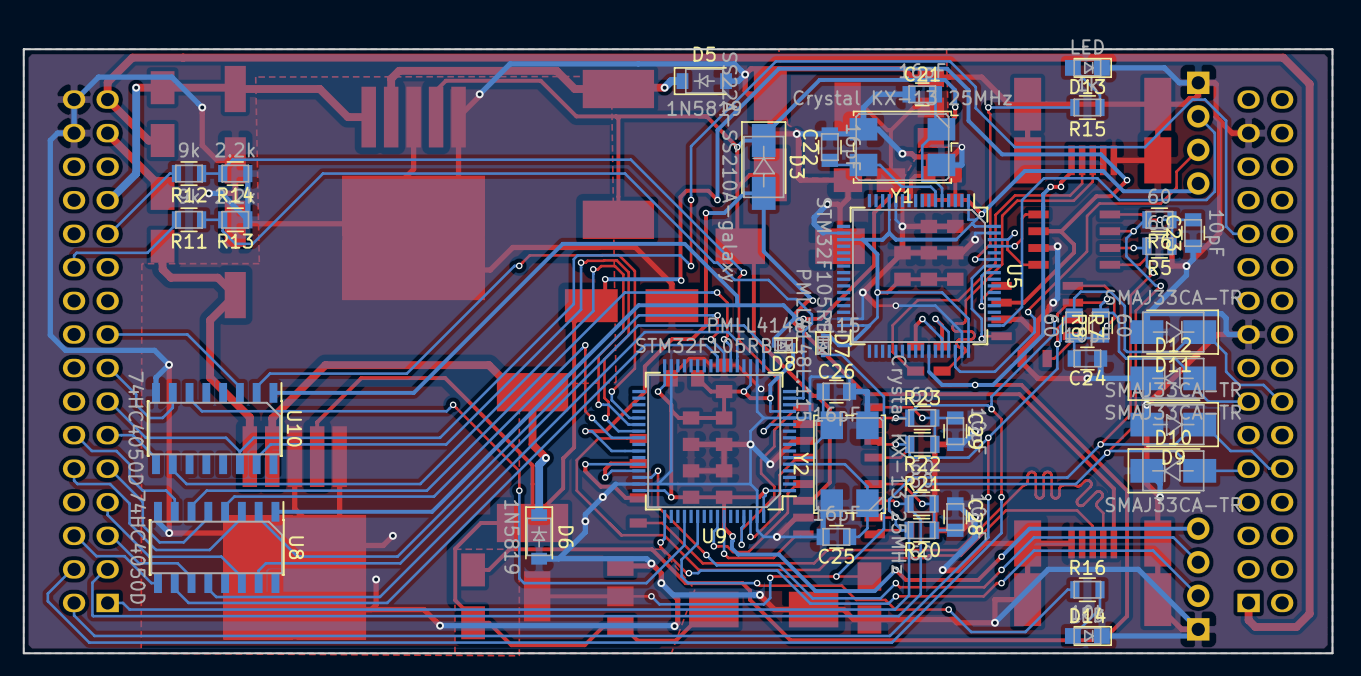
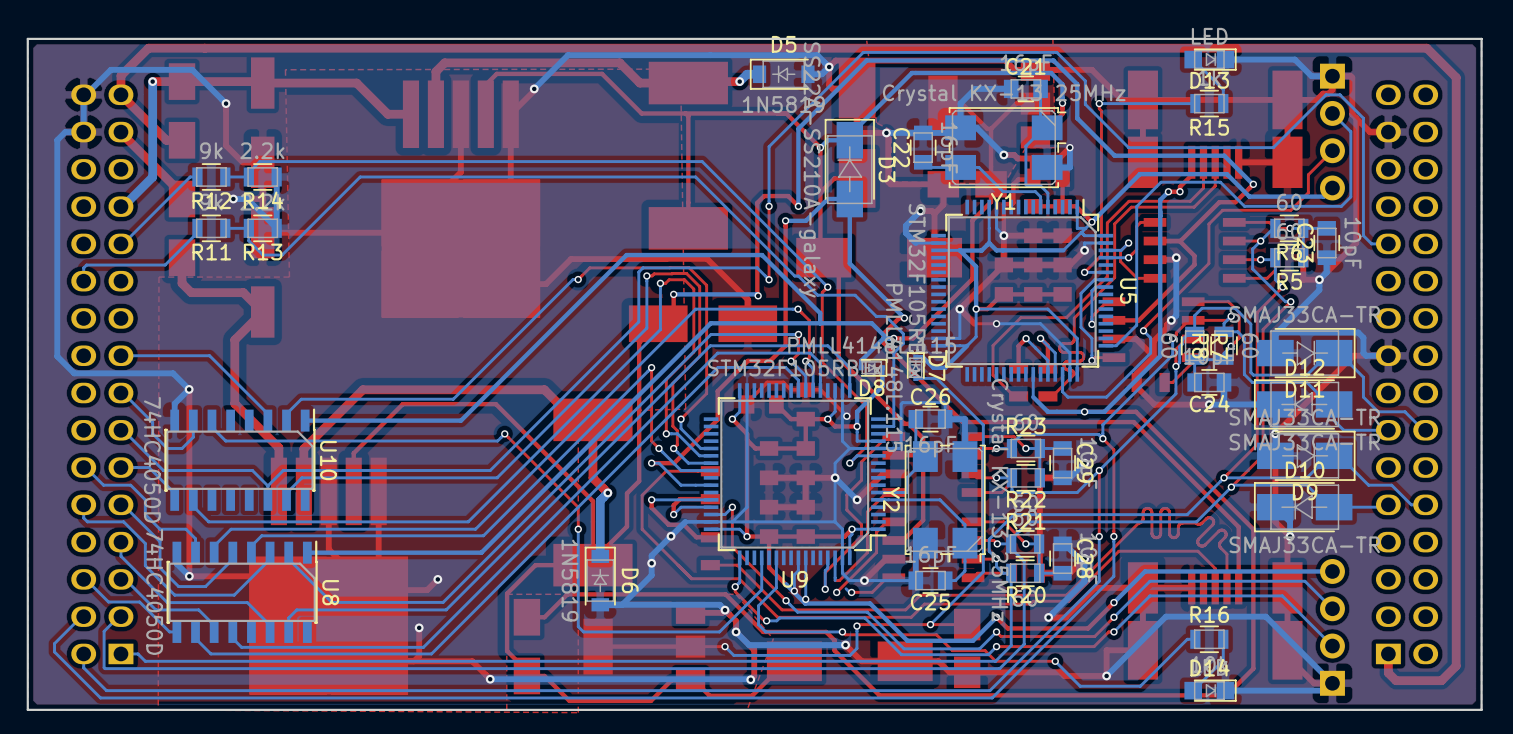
top track: none -> (769, 536) (769, 567) (785, 584)
top track: (724, 497) (724, 527) (732, 536) -> none
top track: (787, 511) (748, 552) (732, 552) (727, 546) (713, 546) -> (876, 552) (836, 592)
bottom track: (732, 536) (731, 548) (738, 554) (779, 554) (782, 557) -> (785, 584) (805, 603) (870, 603)
via: (732, 536) -> none
via: (750, 536) -> none
bottom track: none -> (846, 588) (851, 592)
via: none -> (836, 592)
via: none -> (851, 592)
top track: (783, 547) (773, 557) (728, 557) (724, 553) -> (872, 592) (851, 592)

